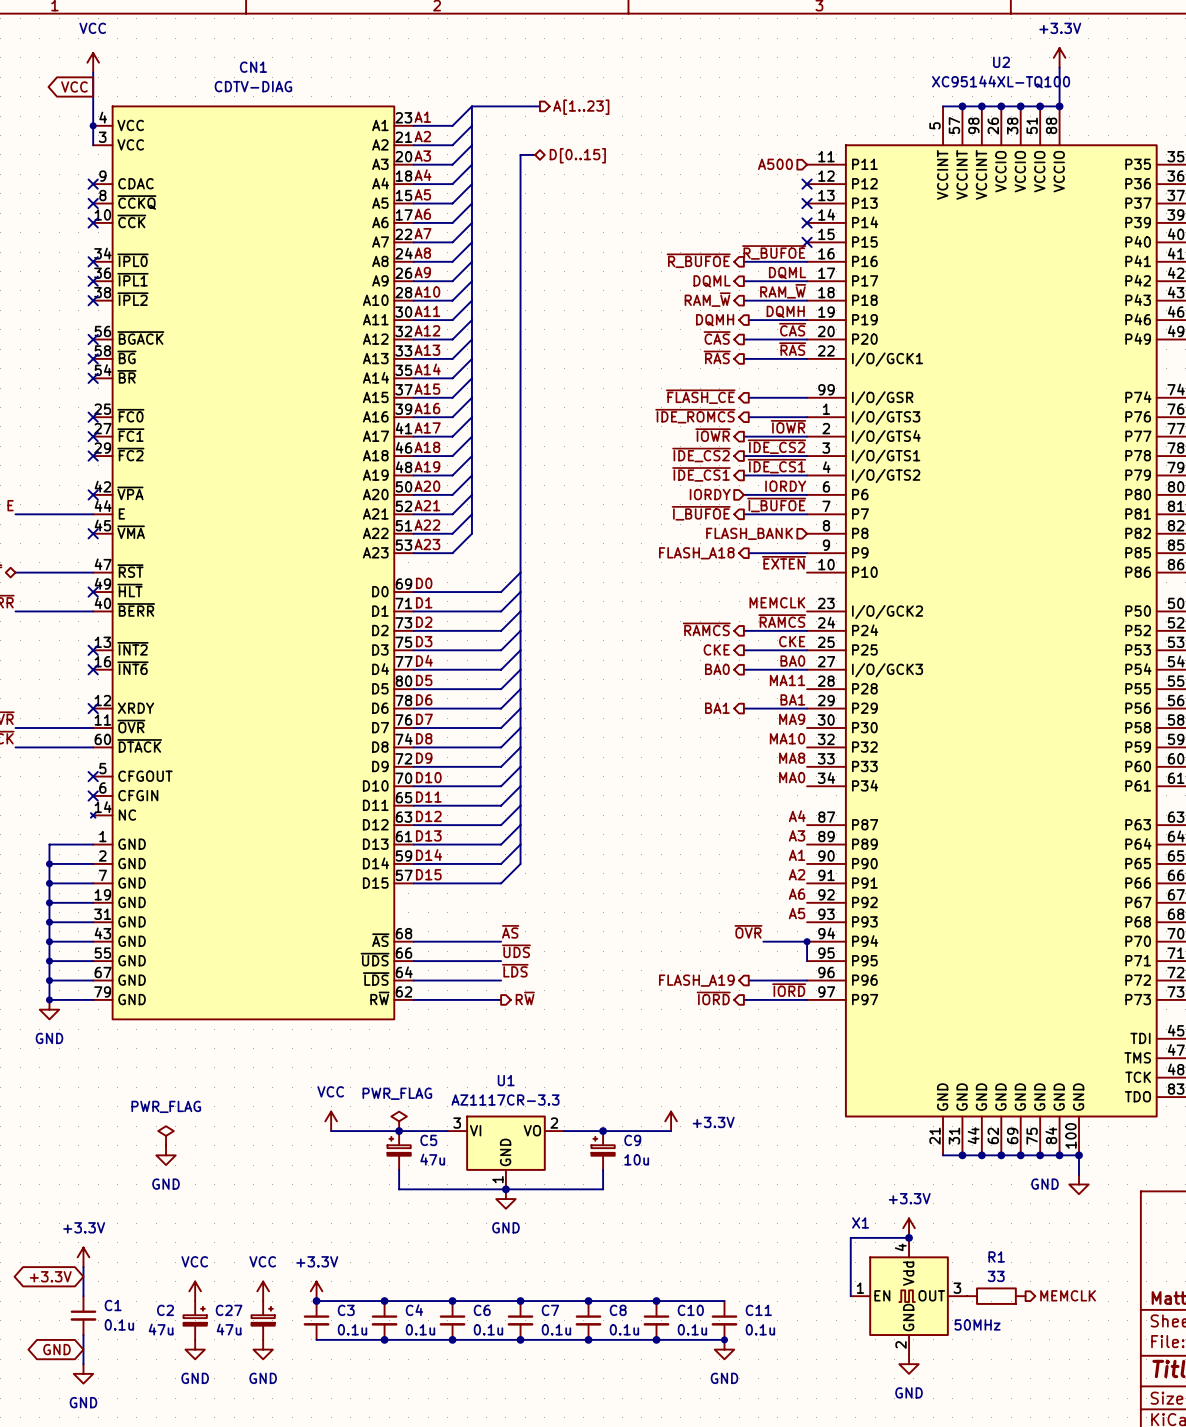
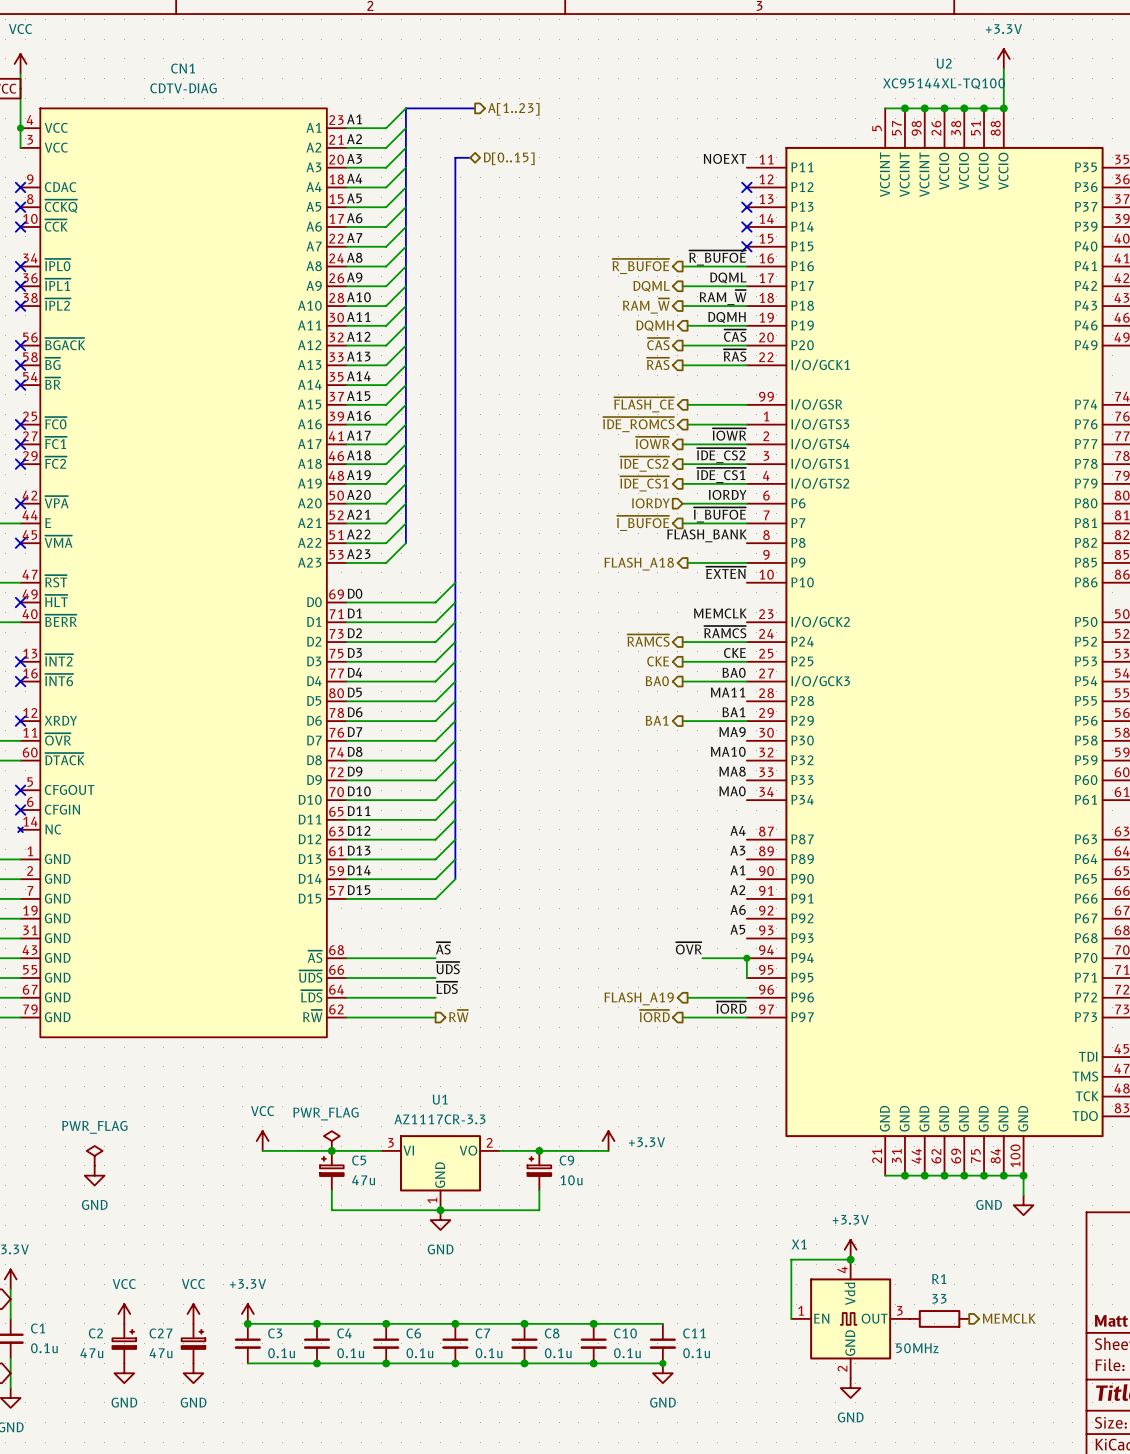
label: none -> NOEXT (725, 158)
hierarchical label: A500 (775, 164) -> none
label: none -> FLASH_BANK (707, 535)
hierarchical label: FLASH_BANK (749, 533) -> none

